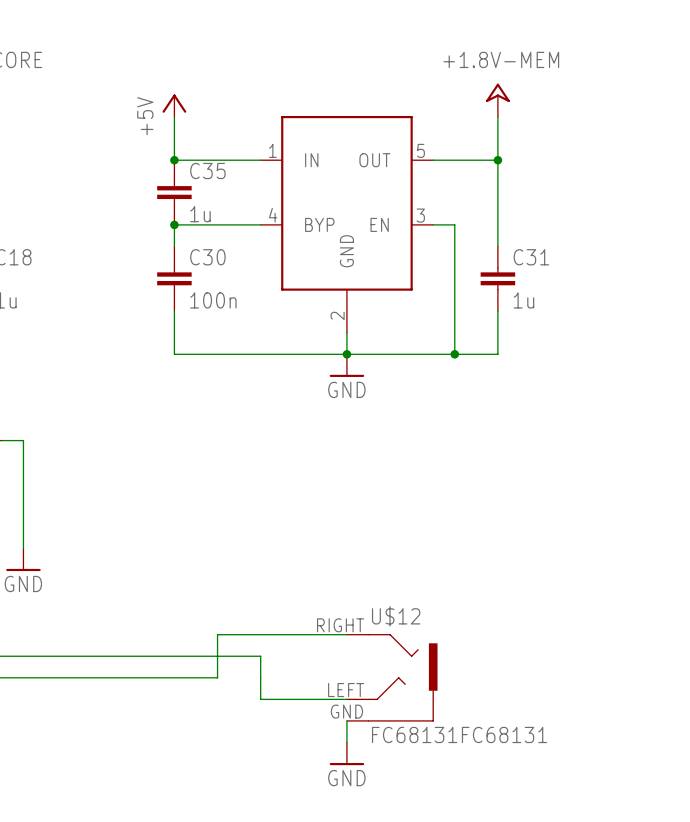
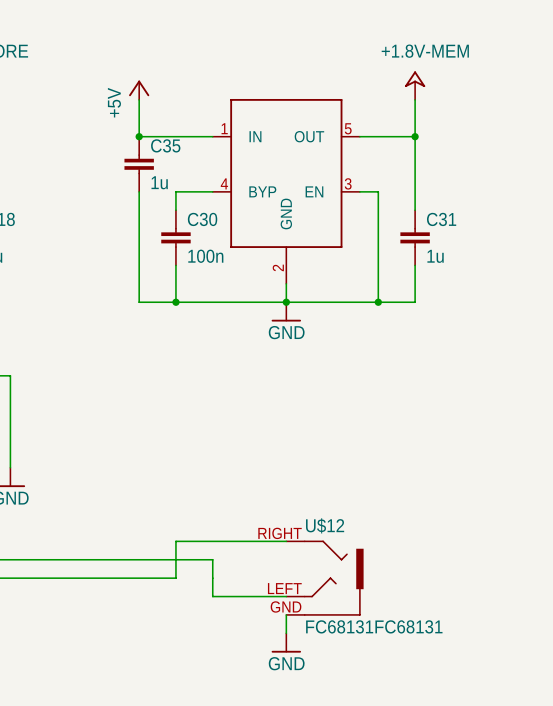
wire: (174, 224) (217, 224) -> (175, 210) (175, 191)
junction: (174, 224) -> none
C30 position: (174, 278) -> (175, 237)
wire: none -> (175, 265) (175, 302)
junction: none -> (175, 302)

